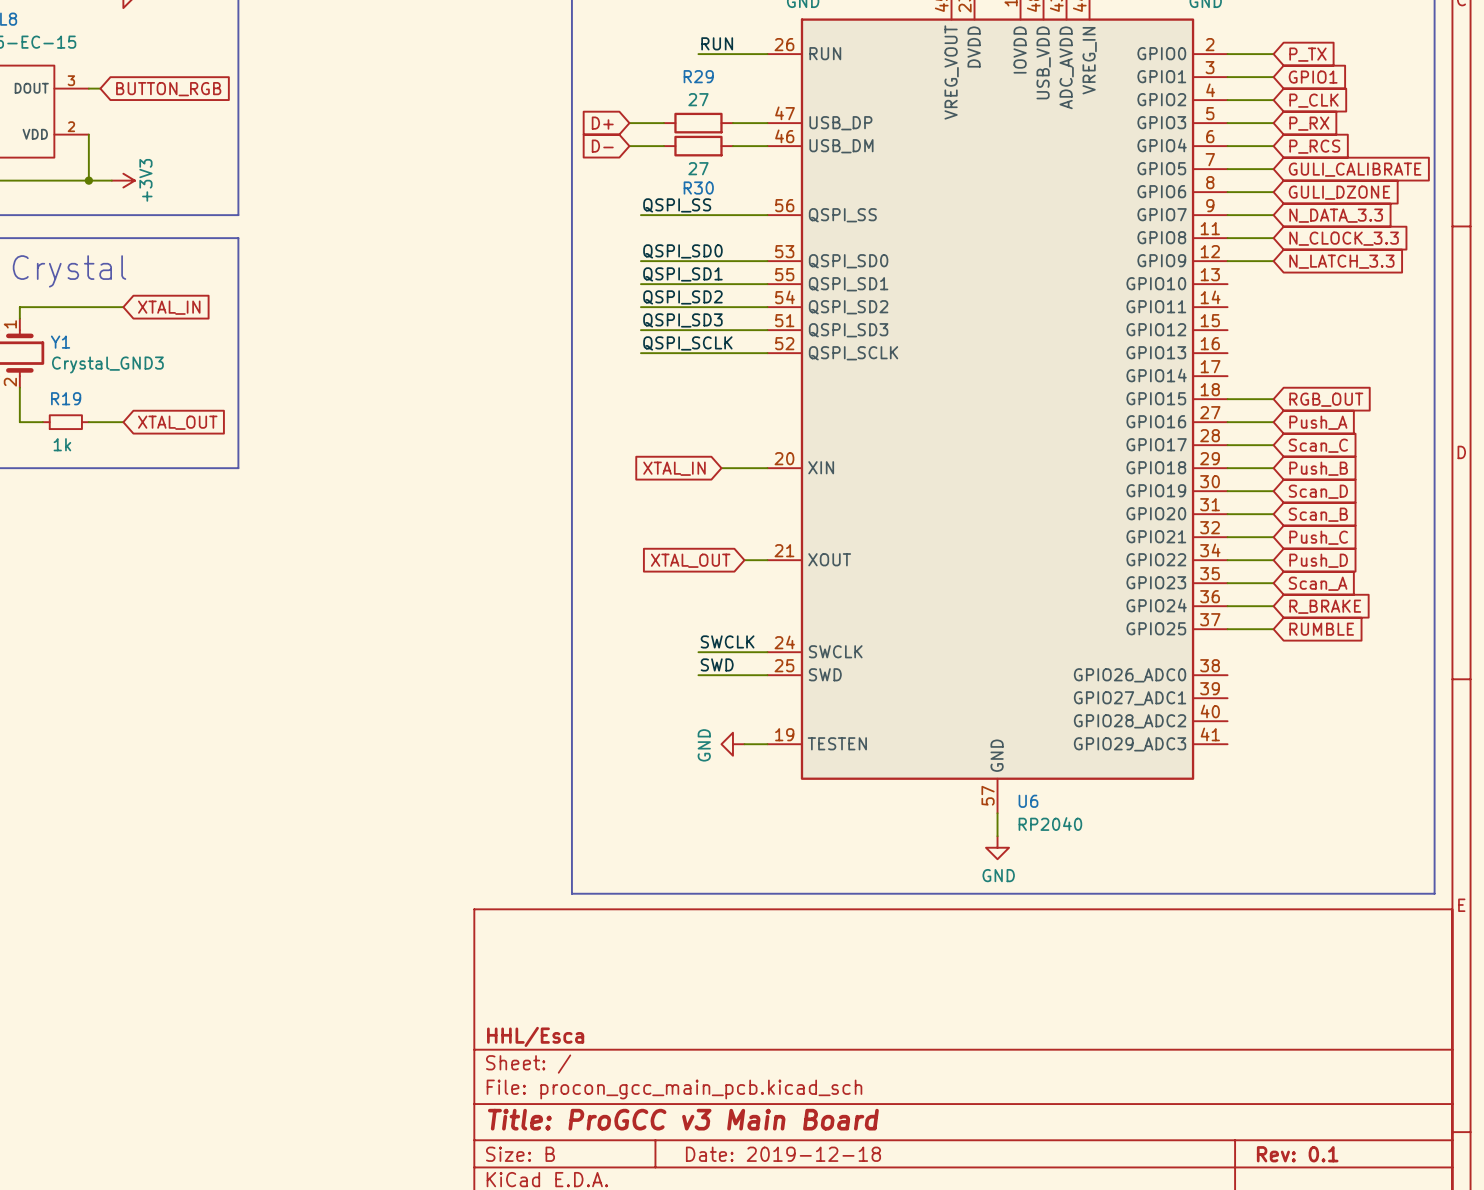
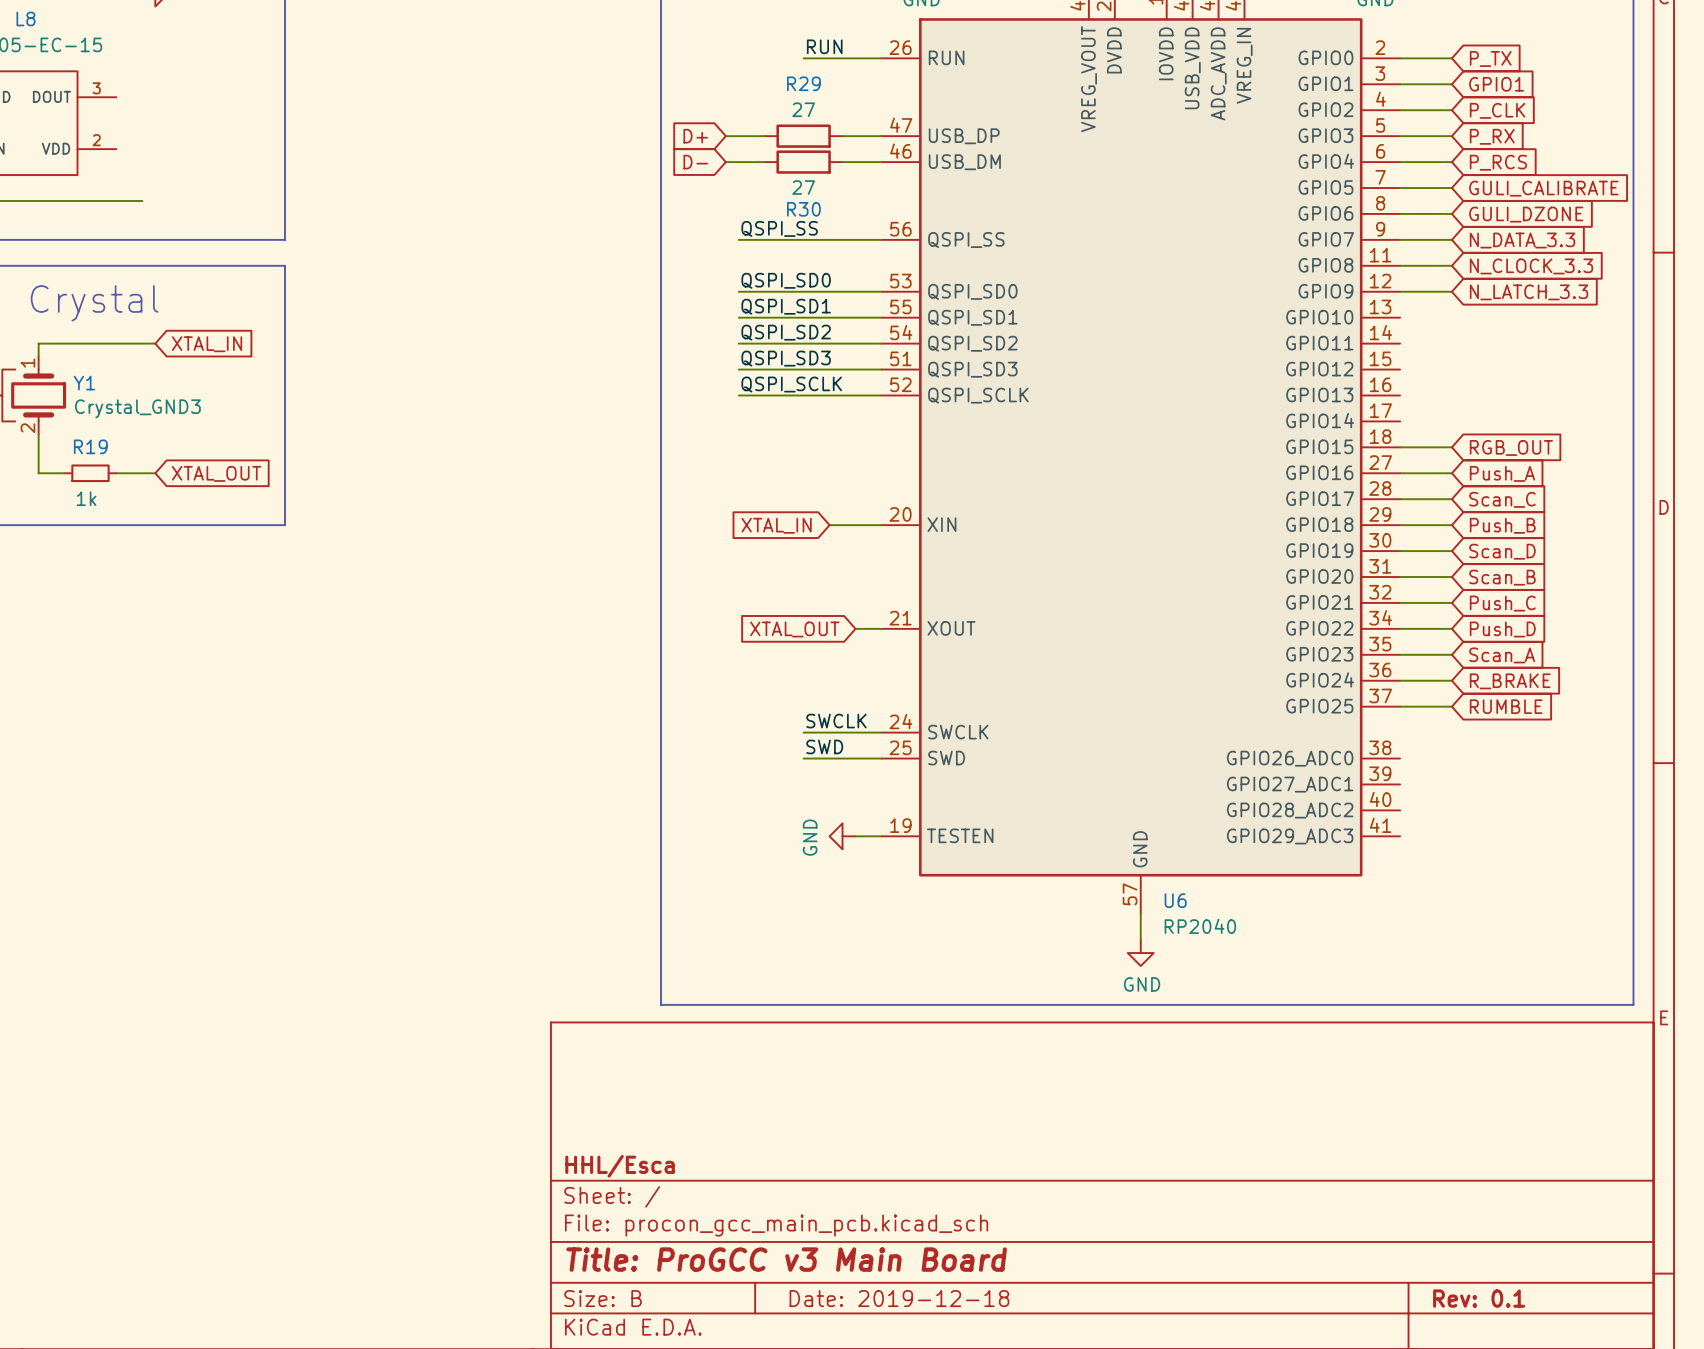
wire: (88, 88) (100, 88) -> none
global label: BUTTON_RGB (168, 89) -> none
wire: (88, 134) (88, 180) -> none
junction: (88, 180) -> none
power symbol: +3V3 (123, 180) -> none

